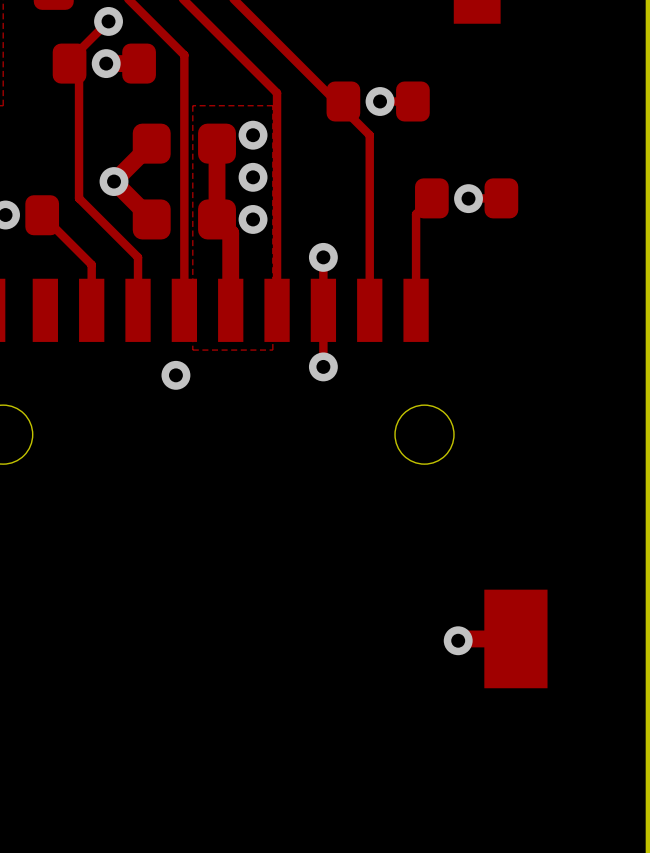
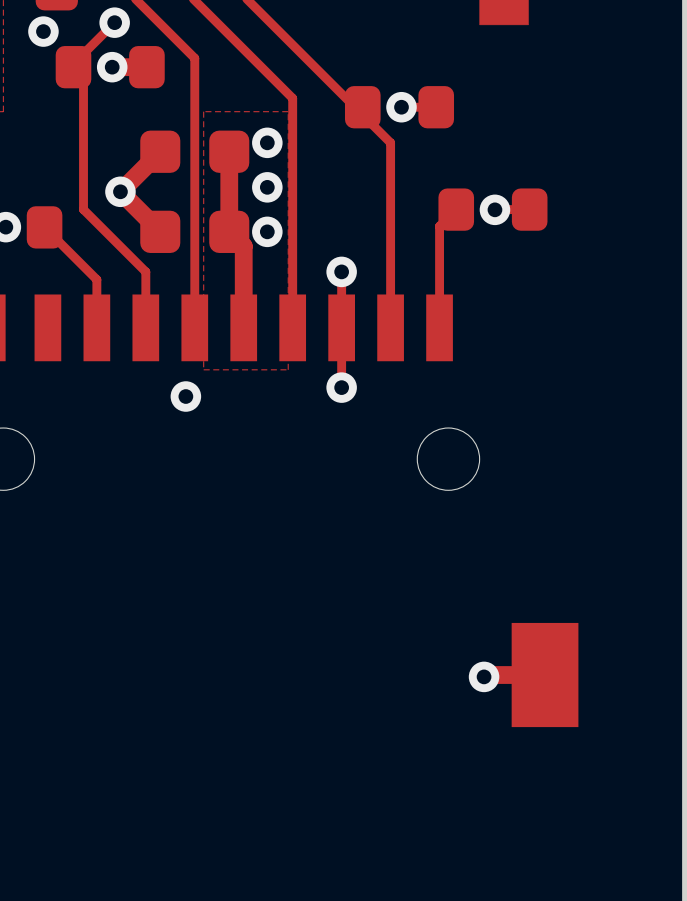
via: none -> (43, 31)

